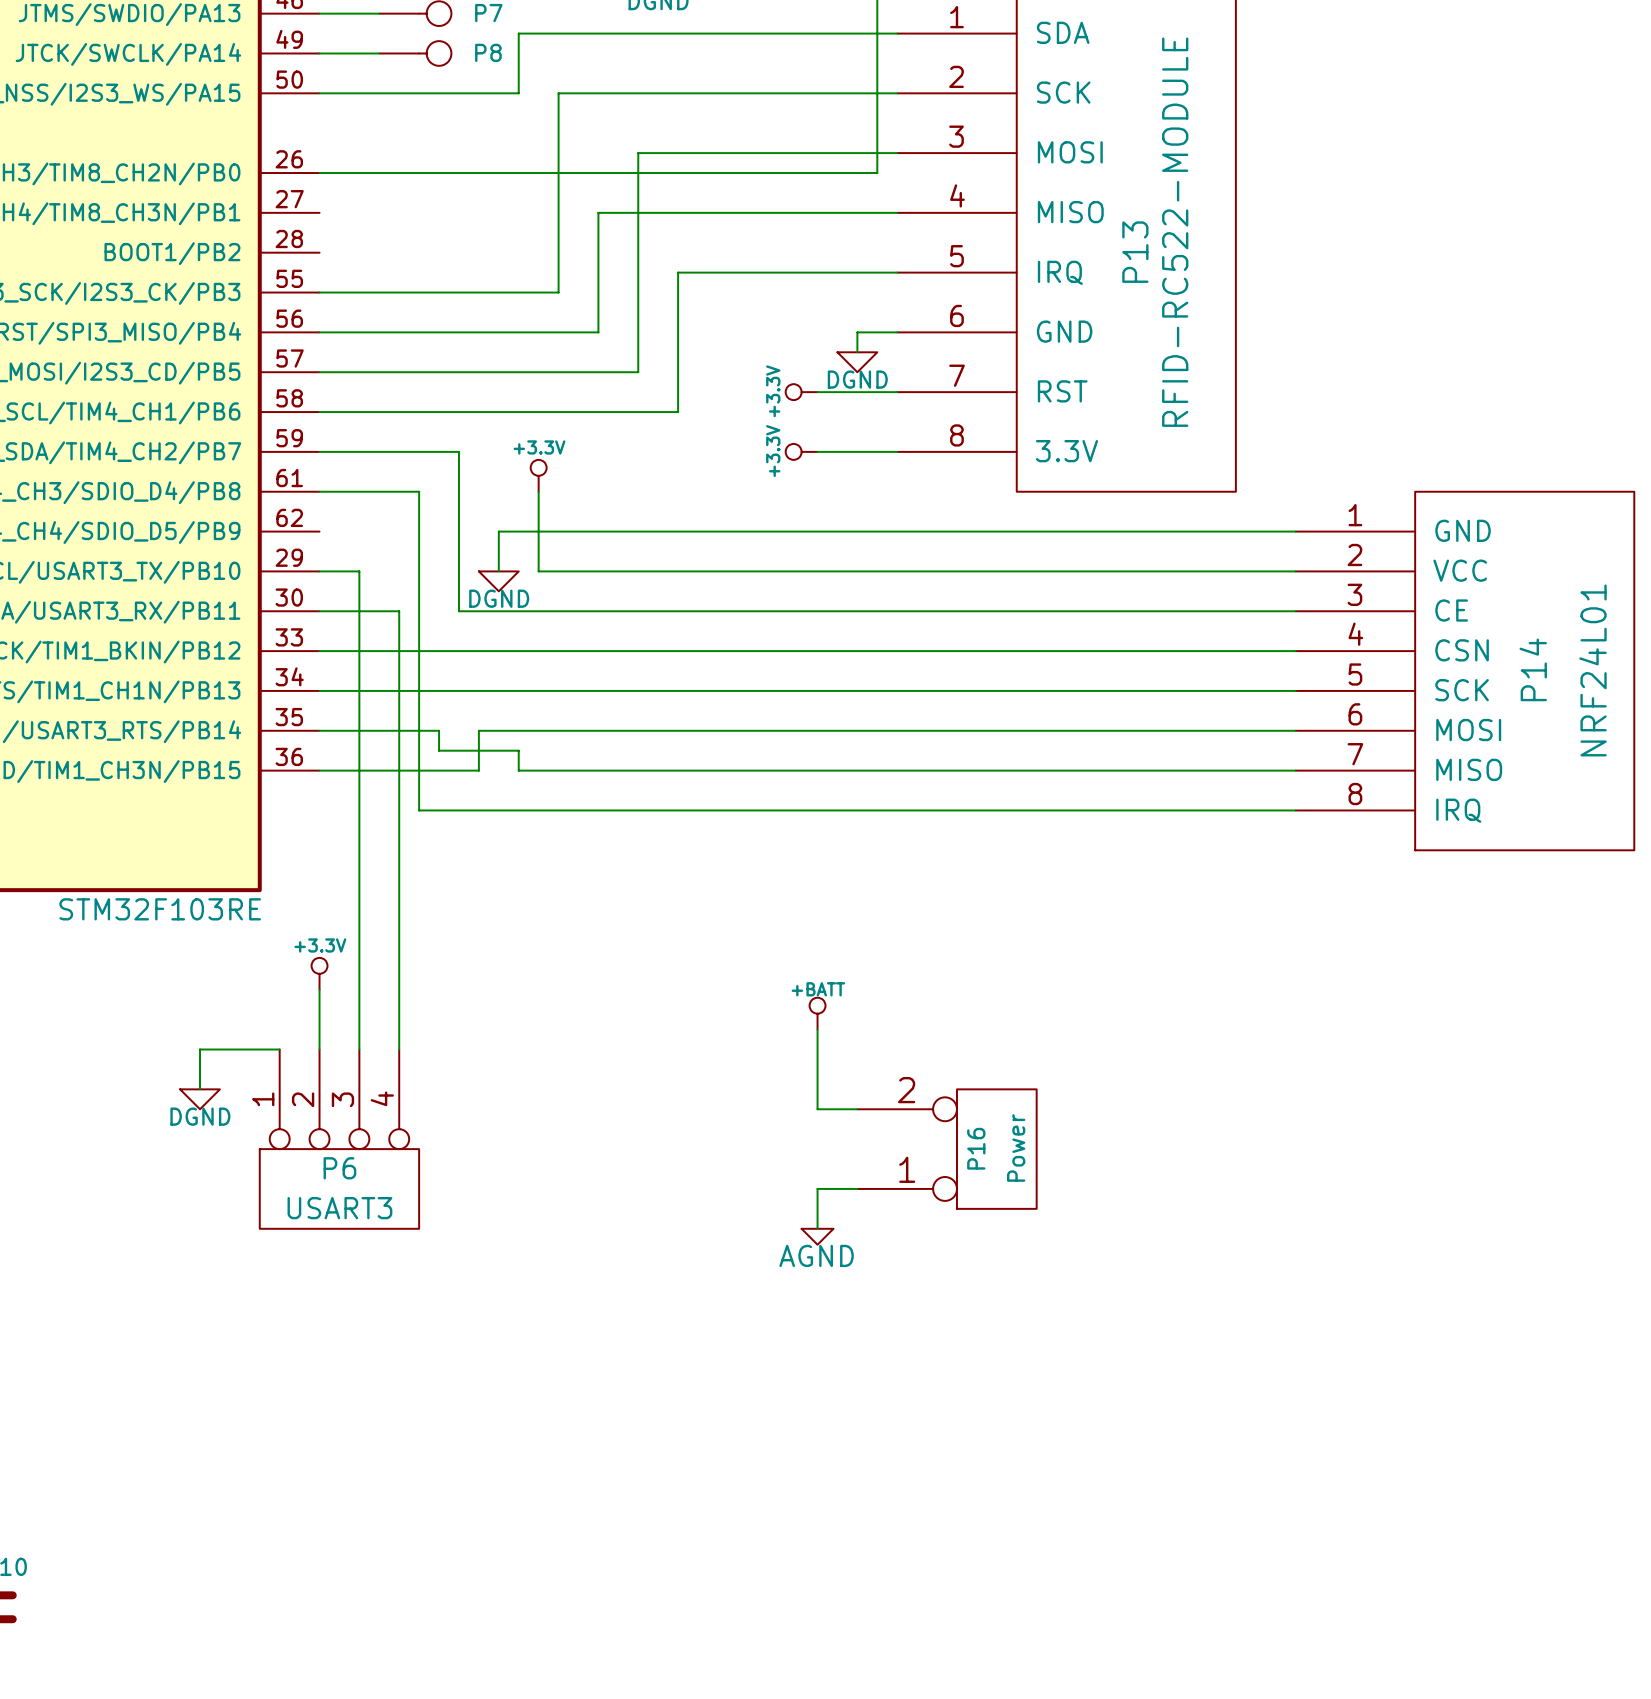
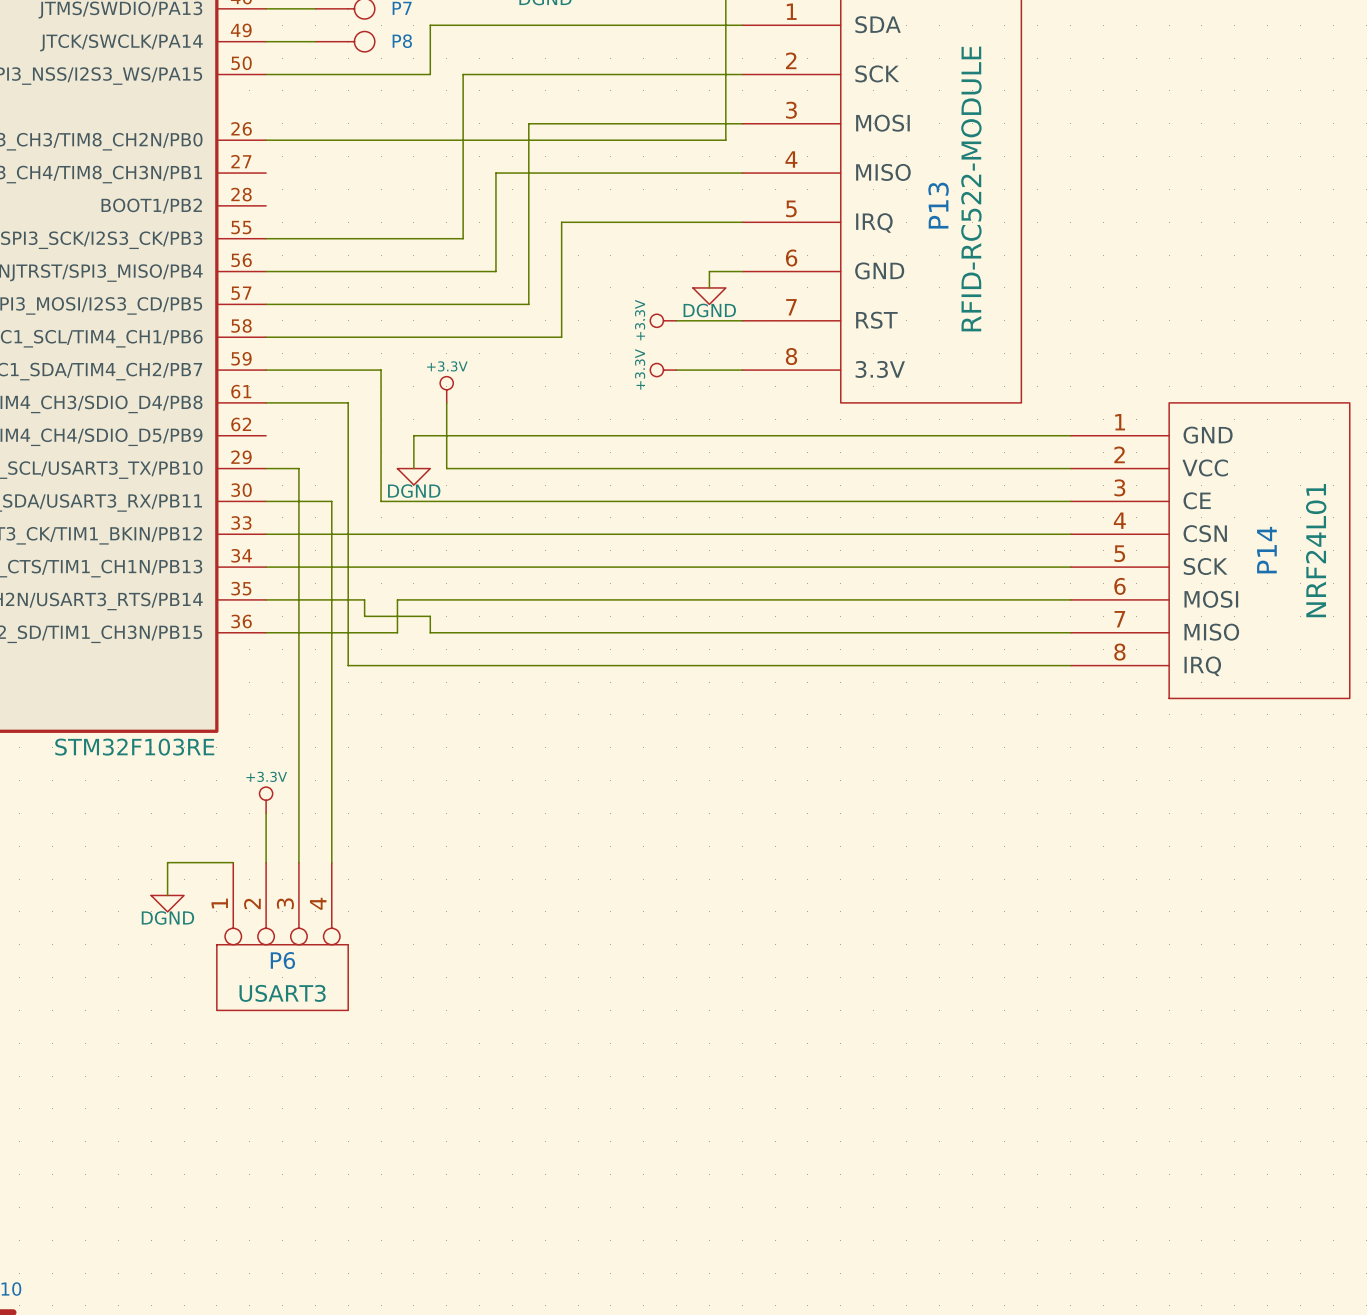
power symbol: +BATT (817, 1013) -> none
wire: (817, 1029) (817, 1109) (857, 1109) -> none
P16: Power (947, 1149) -> none
wire: (857, 1188) (817, 1188) (817, 1228) -> none
power symbol: AGND (817, 1236) -> none

